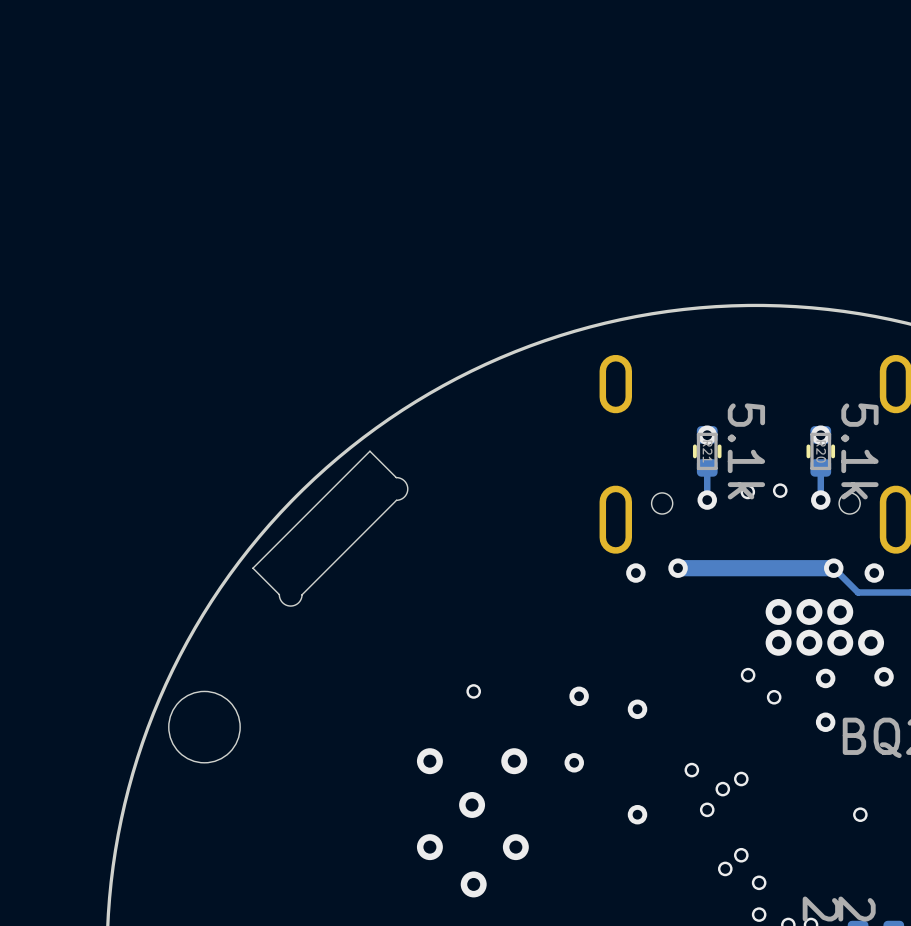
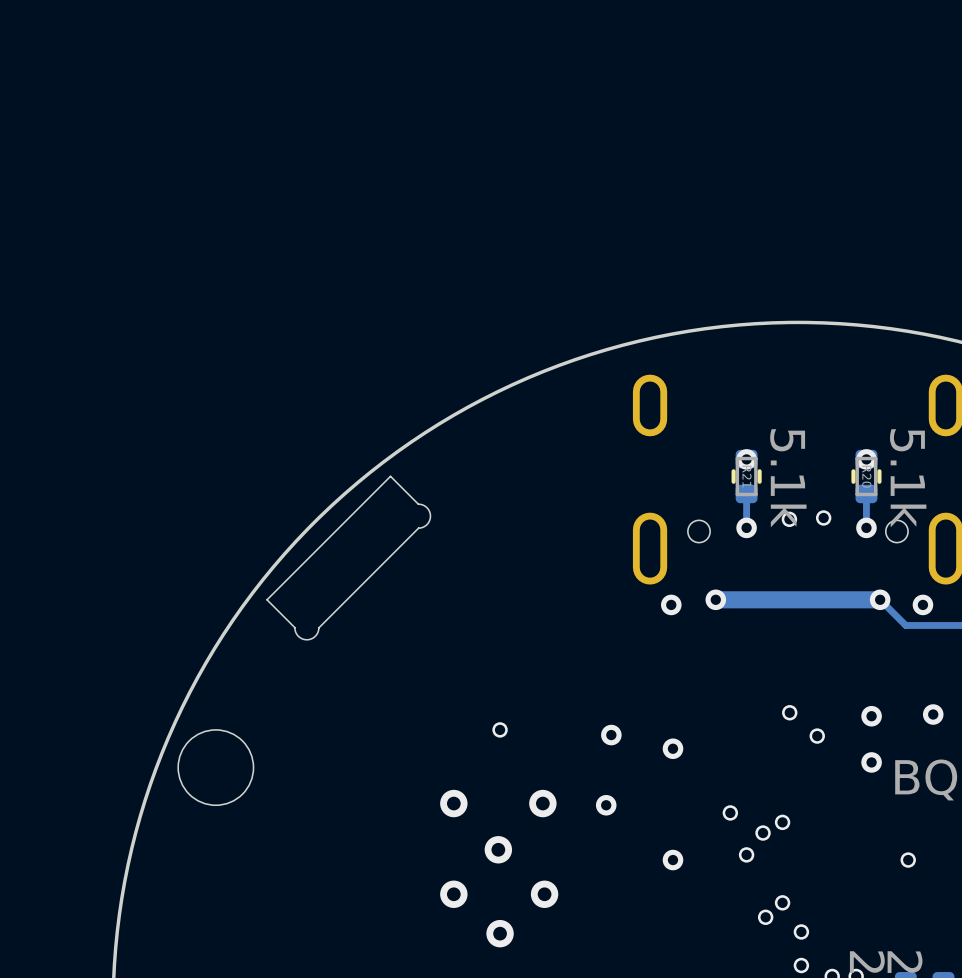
via: (778, 611) -> none
via: (809, 611) -> none
via: (840, 611) -> none
via: (778, 642) -> none
via: (809, 642) -> none
via: (840, 642) -> none
via: (871, 642) -> none

